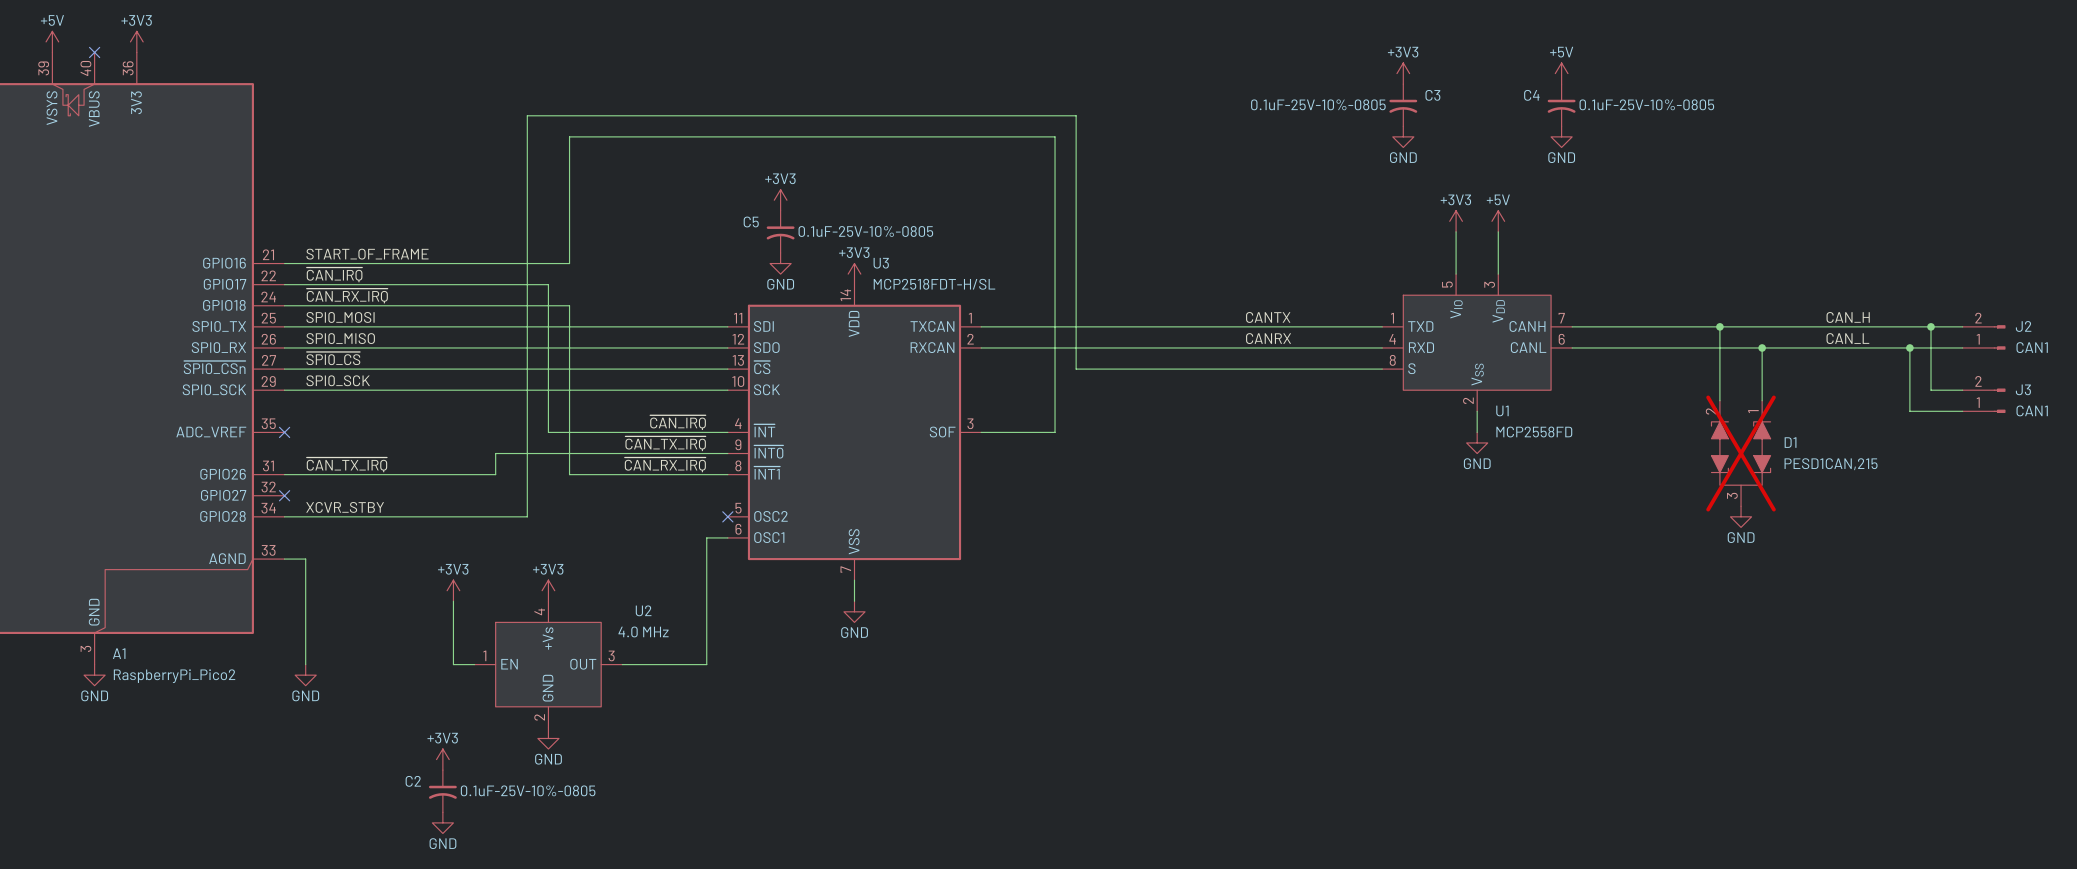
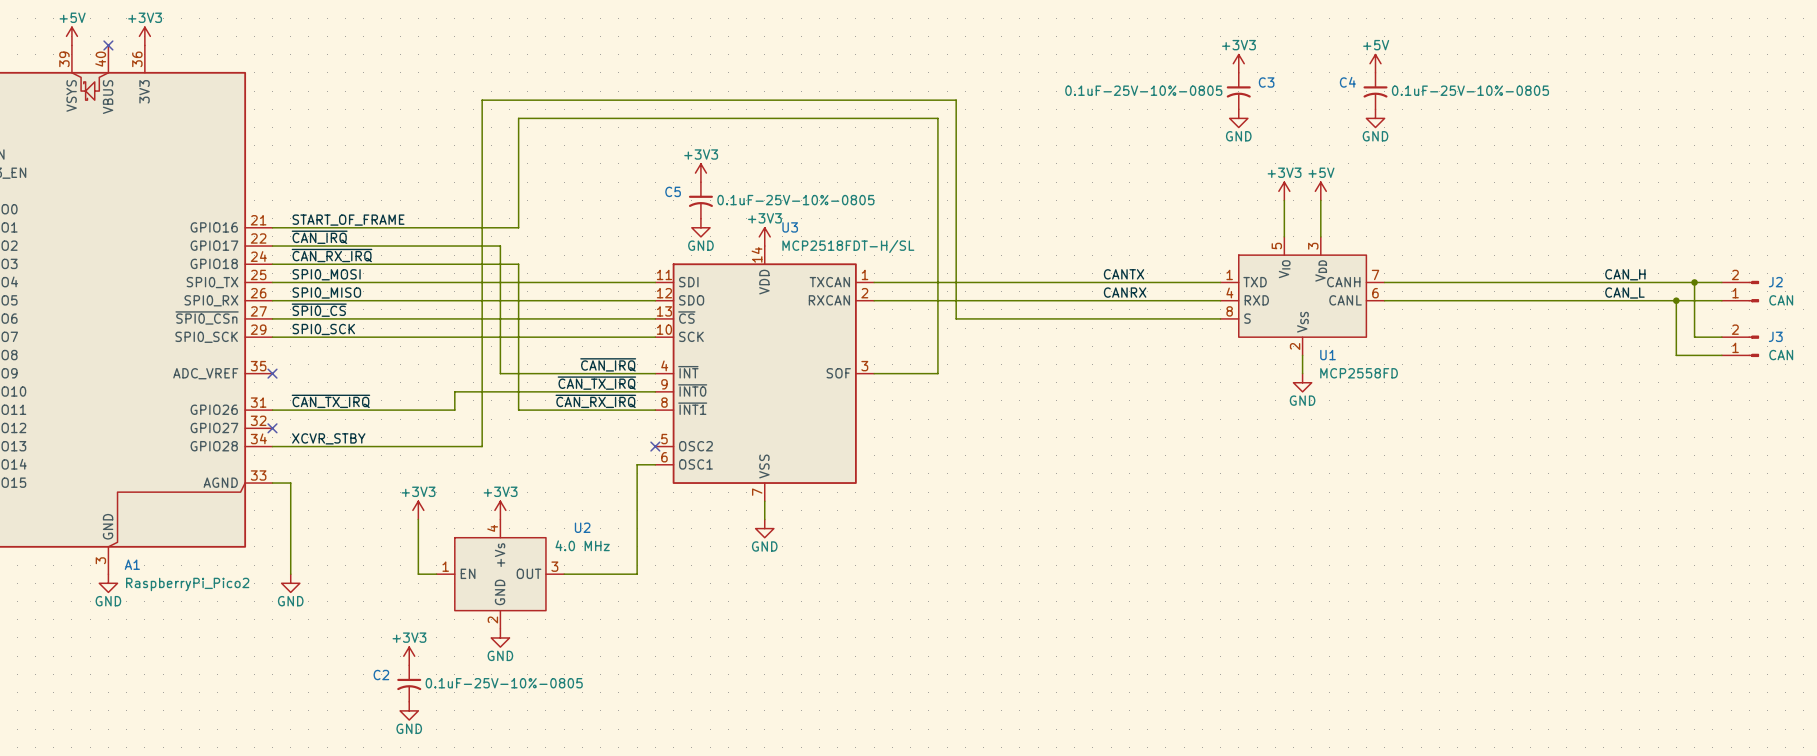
wire: (1719, 326) (1719, 400) -> none
junction: (1719, 326) -> none
wire: (1762, 347) (1762, 400) -> none
junction: (1762, 347) -> none
J2 value: CAN1 (2032, 347) -> CAN (1781, 300)
J3 value: CAN1 (2032, 410) -> CAN (1781, 355)
D1: (1741, 453) -> none
power symbol: GND (1741, 516) -> none

